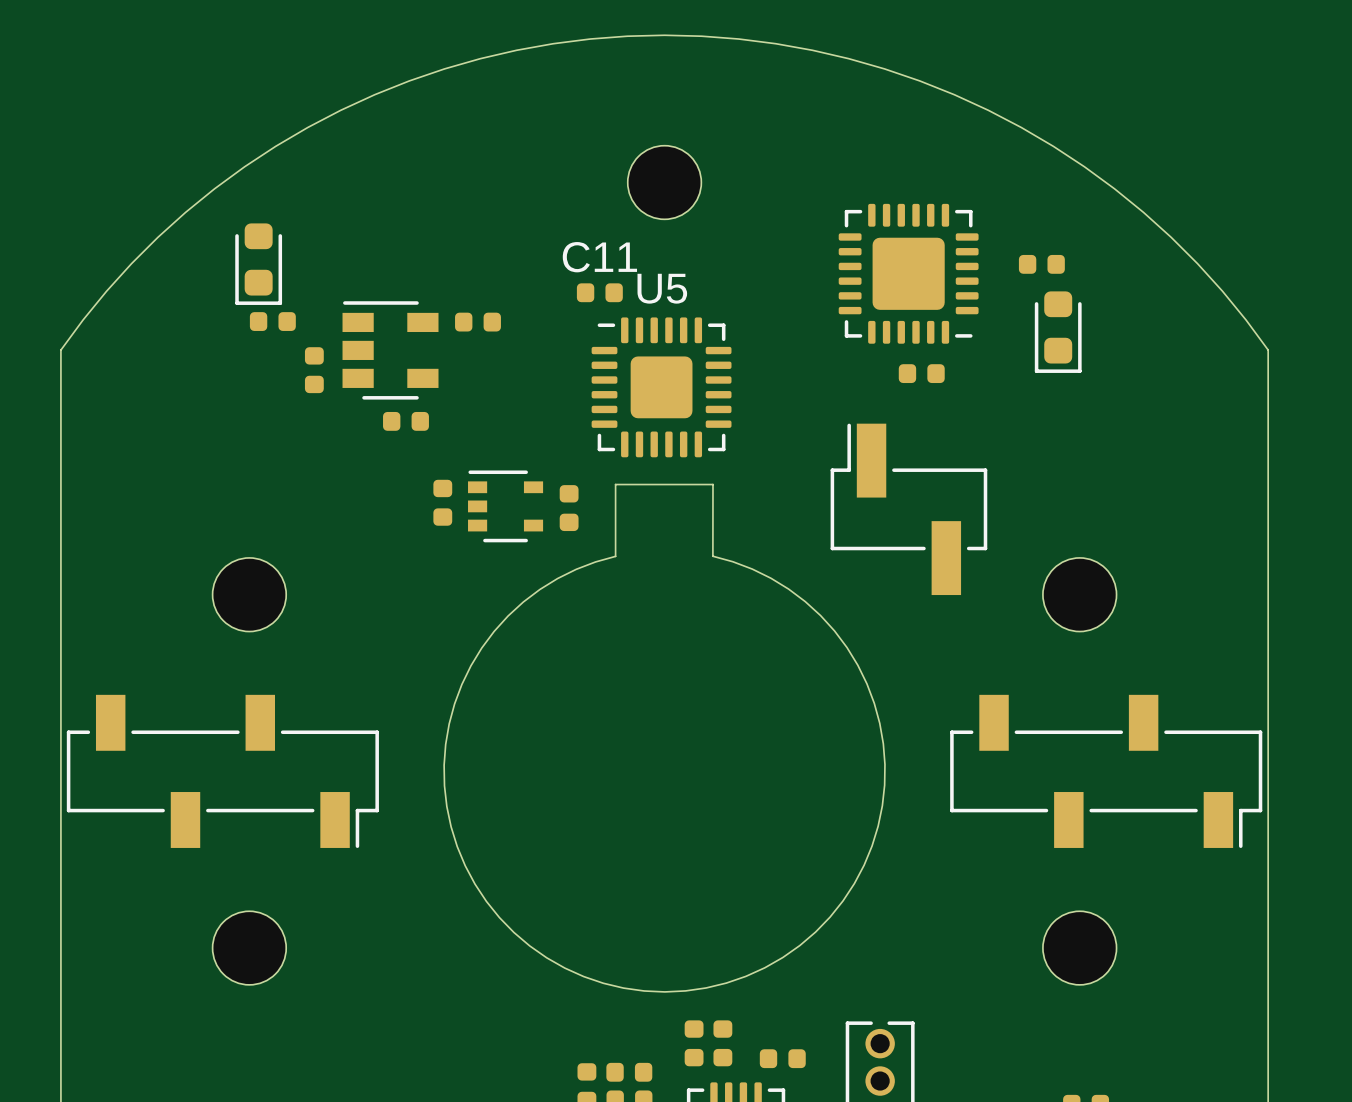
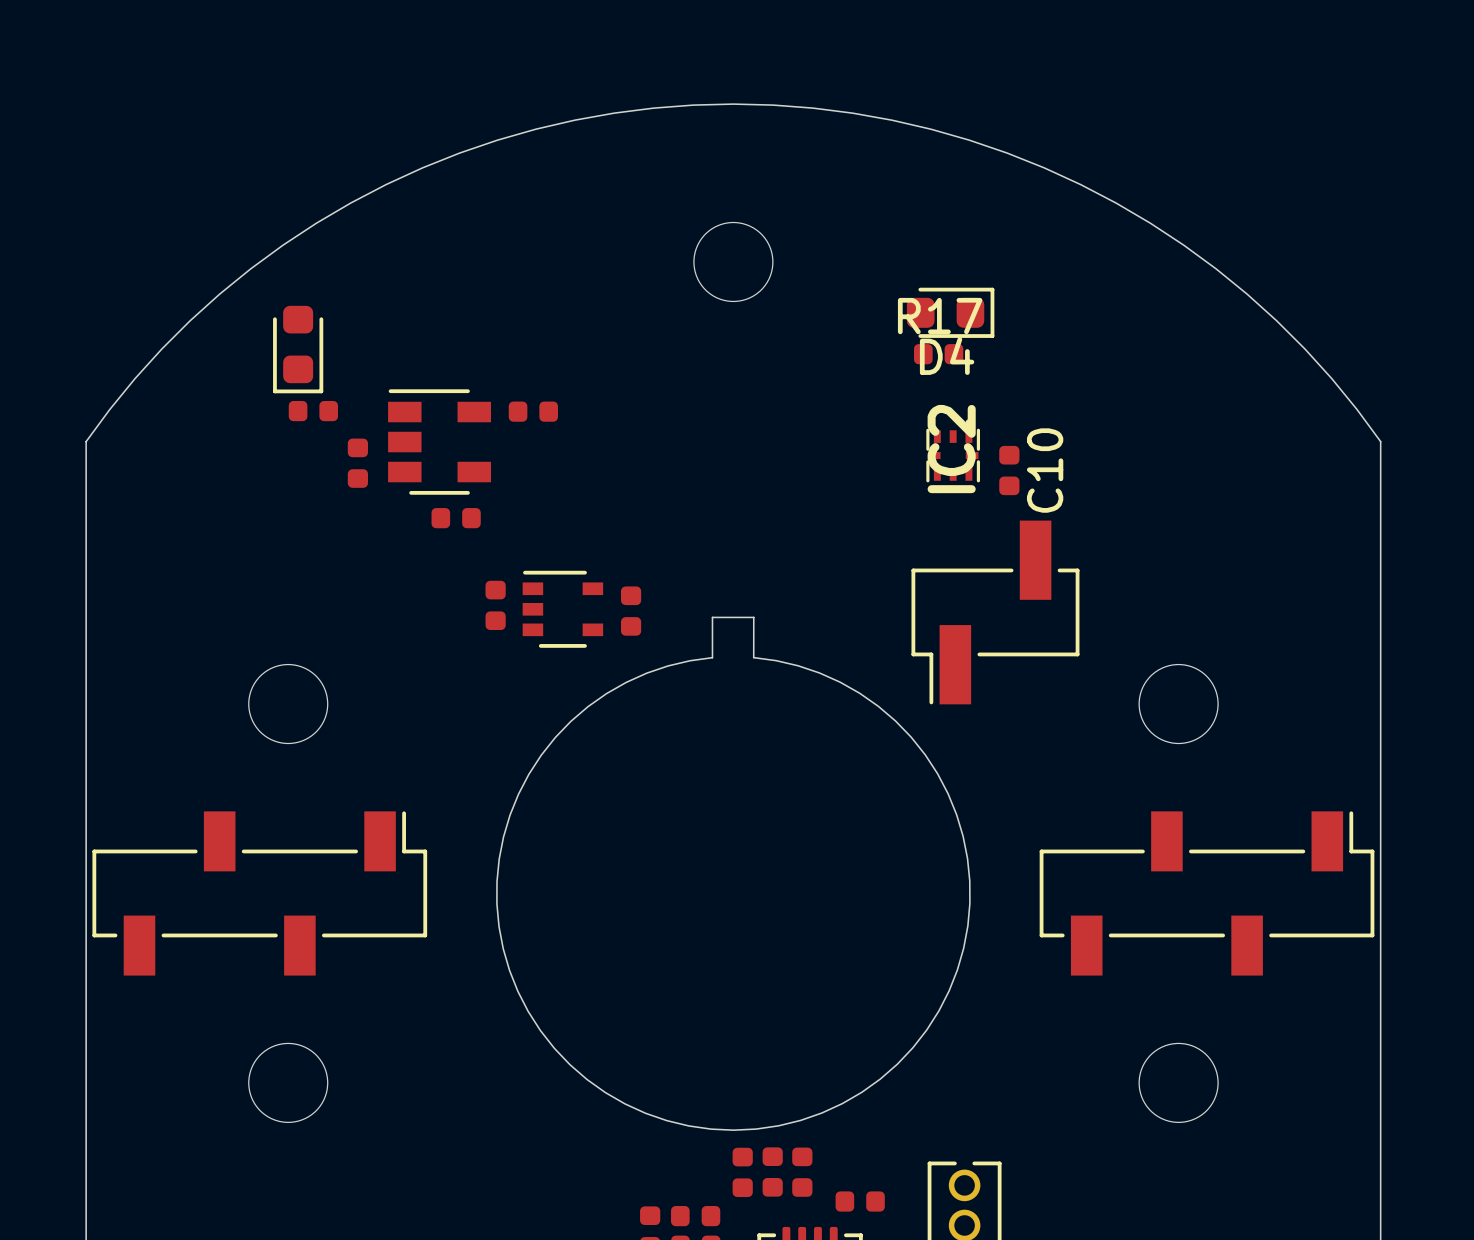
D4: none -> (950, 312)
part: (1041, 264) -> none
R17: none -> (938, 354)
part: (908, 273) -> none
C11: (599, 292) -> none
part: (1058, 332) -> none
IC2: none -> (953, 450)
part: (921, 373) -> none
C10: none -> (1009, 470)
U5: (661, 387) -> none
part footprint: [830, 423, 988, 596] -> [911, 520, 1080, 705]
board edge: (615, 484) (615, 556) (576, 569) (539, 589) (523, 601) (494, 631) (470, 665) (454, 703) (449, 723) (444, 765) (446, 806) (457, 846) (475, 884) (499, 917) (529, 945) (564, 968) (603, 983) (623, 988) (664, 991) (706, 987) (745, 976) (782, 957) (815, 932) (843, 900) (864, 865) (878, 826) (882, 805) (884, 764) (879, 723) (874, 703) (857, 665) (834, 630) (820, 615) (805, 601) (770, 578) (752, 569) (712, 556) (712, 484) (615, 484) -> (712, 617) (712, 657) (668, 665) (646, 673) (606, 693) (570, 721) (541, 755) (518, 794) (503, 836) (496, 881) (496, 904) (503, 948) (517, 991) (540, 1030) (569, 1064) (605, 1092) (645, 1113) (688, 1125) (711, 1129) (756, 1129) (800, 1120) (842, 1103) (880, 1079) (912, 1047) (938, 1011) (957, 969) (967, 925) (969, 880) (963, 836) (948, 793) (925, 754) (895, 720) (878, 706) (840, 682) (798, 665) (753, 657) (753, 617) (712, 617)
part footprint: [66, 694, 379, 848] -> [92, 811, 428, 976]
part footprint: [950, 694, 1263, 848] -> [1039, 811, 1375, 976]
part: none -> (742, 1172)
part: none -> (772, 1172)
part: none -> (802, 1172)
part: (694, 1043) -> none
part: (722, 1043) -> none

